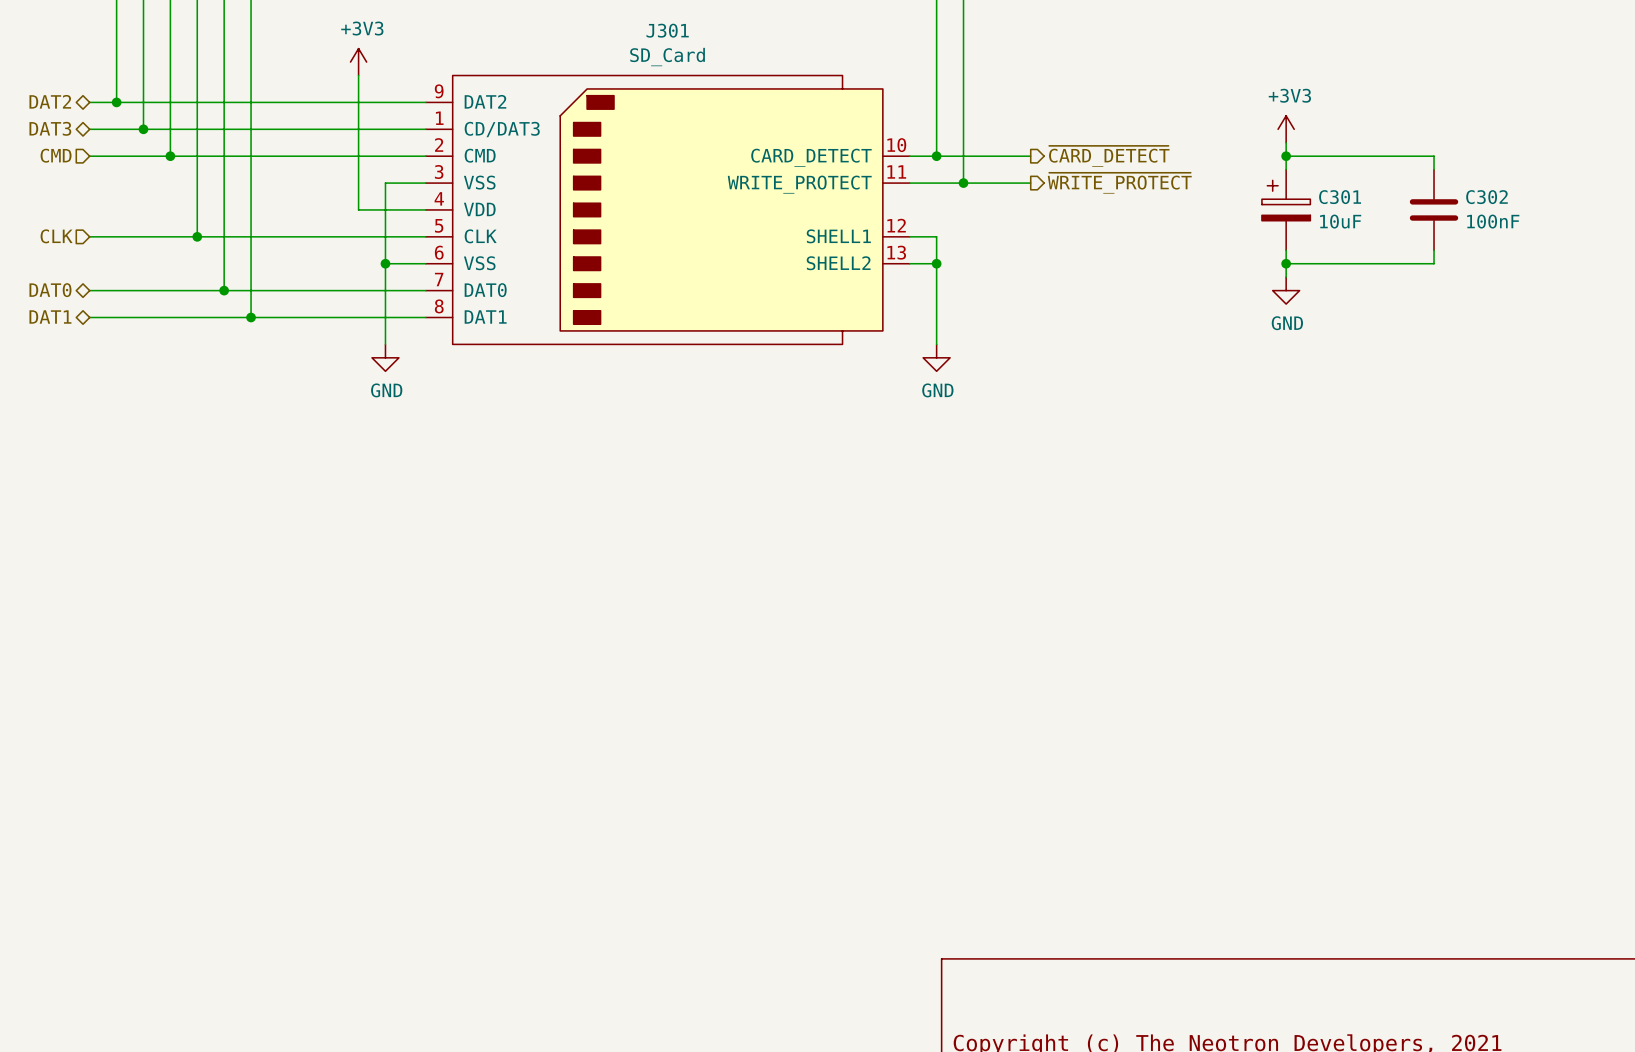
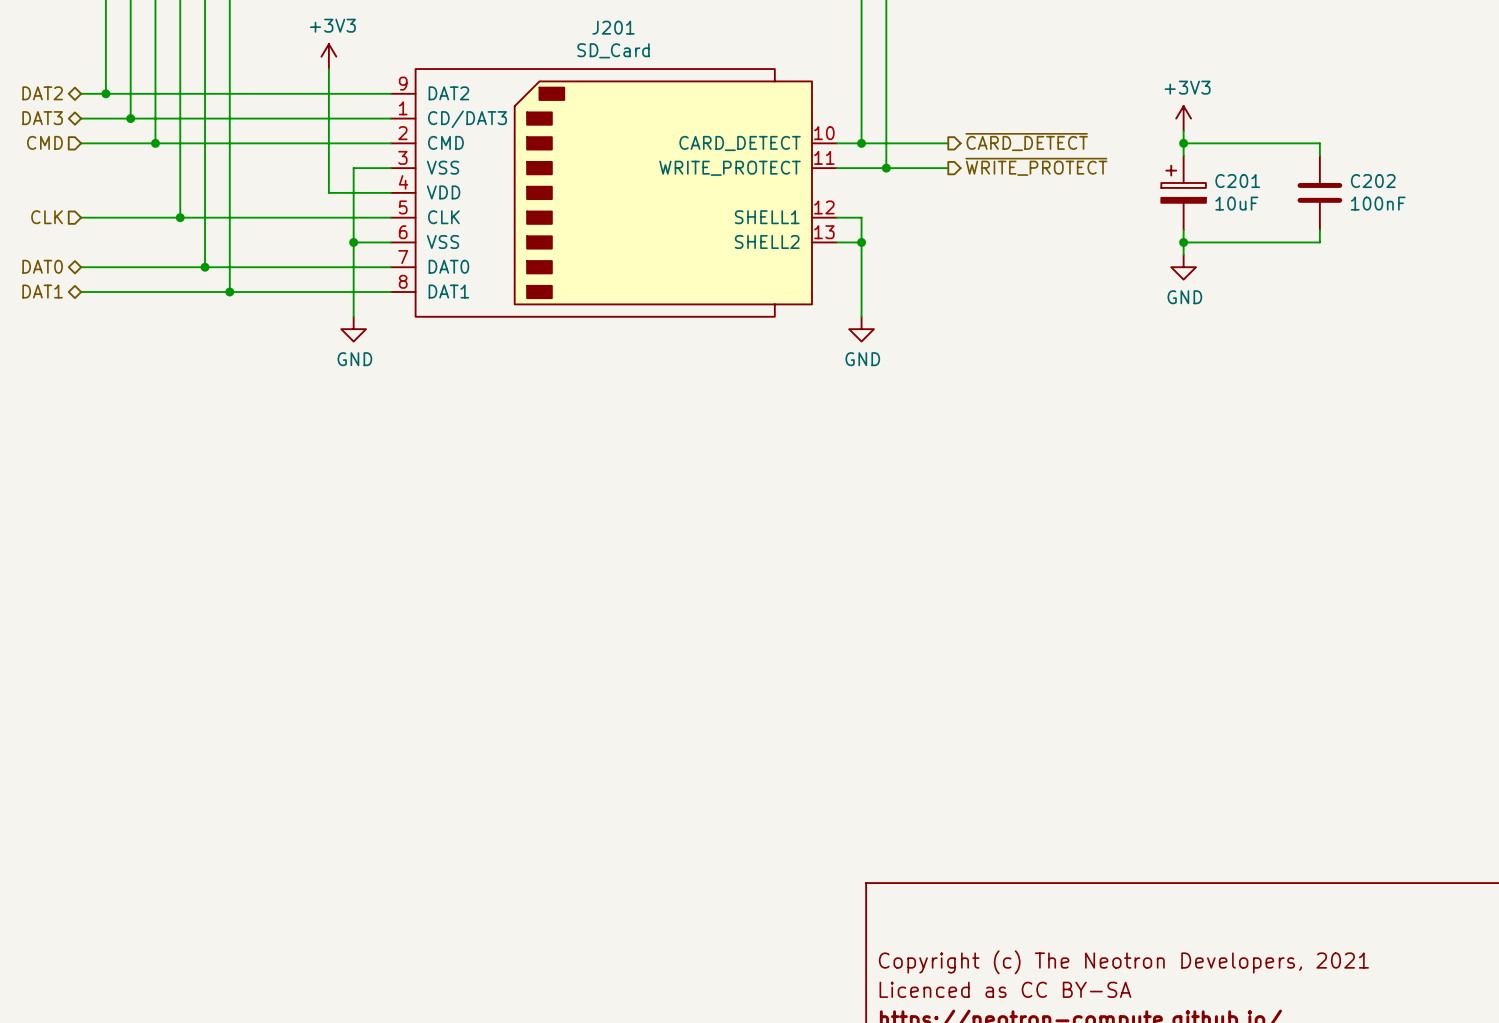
J301 name: J301 (667, 30) -> J201 (613, 27)
C301 name: C301 (1340, 197) -> C201 (1237, 181)
C302 name: C302 (1486, 197) -> C202 (1373, 181)

